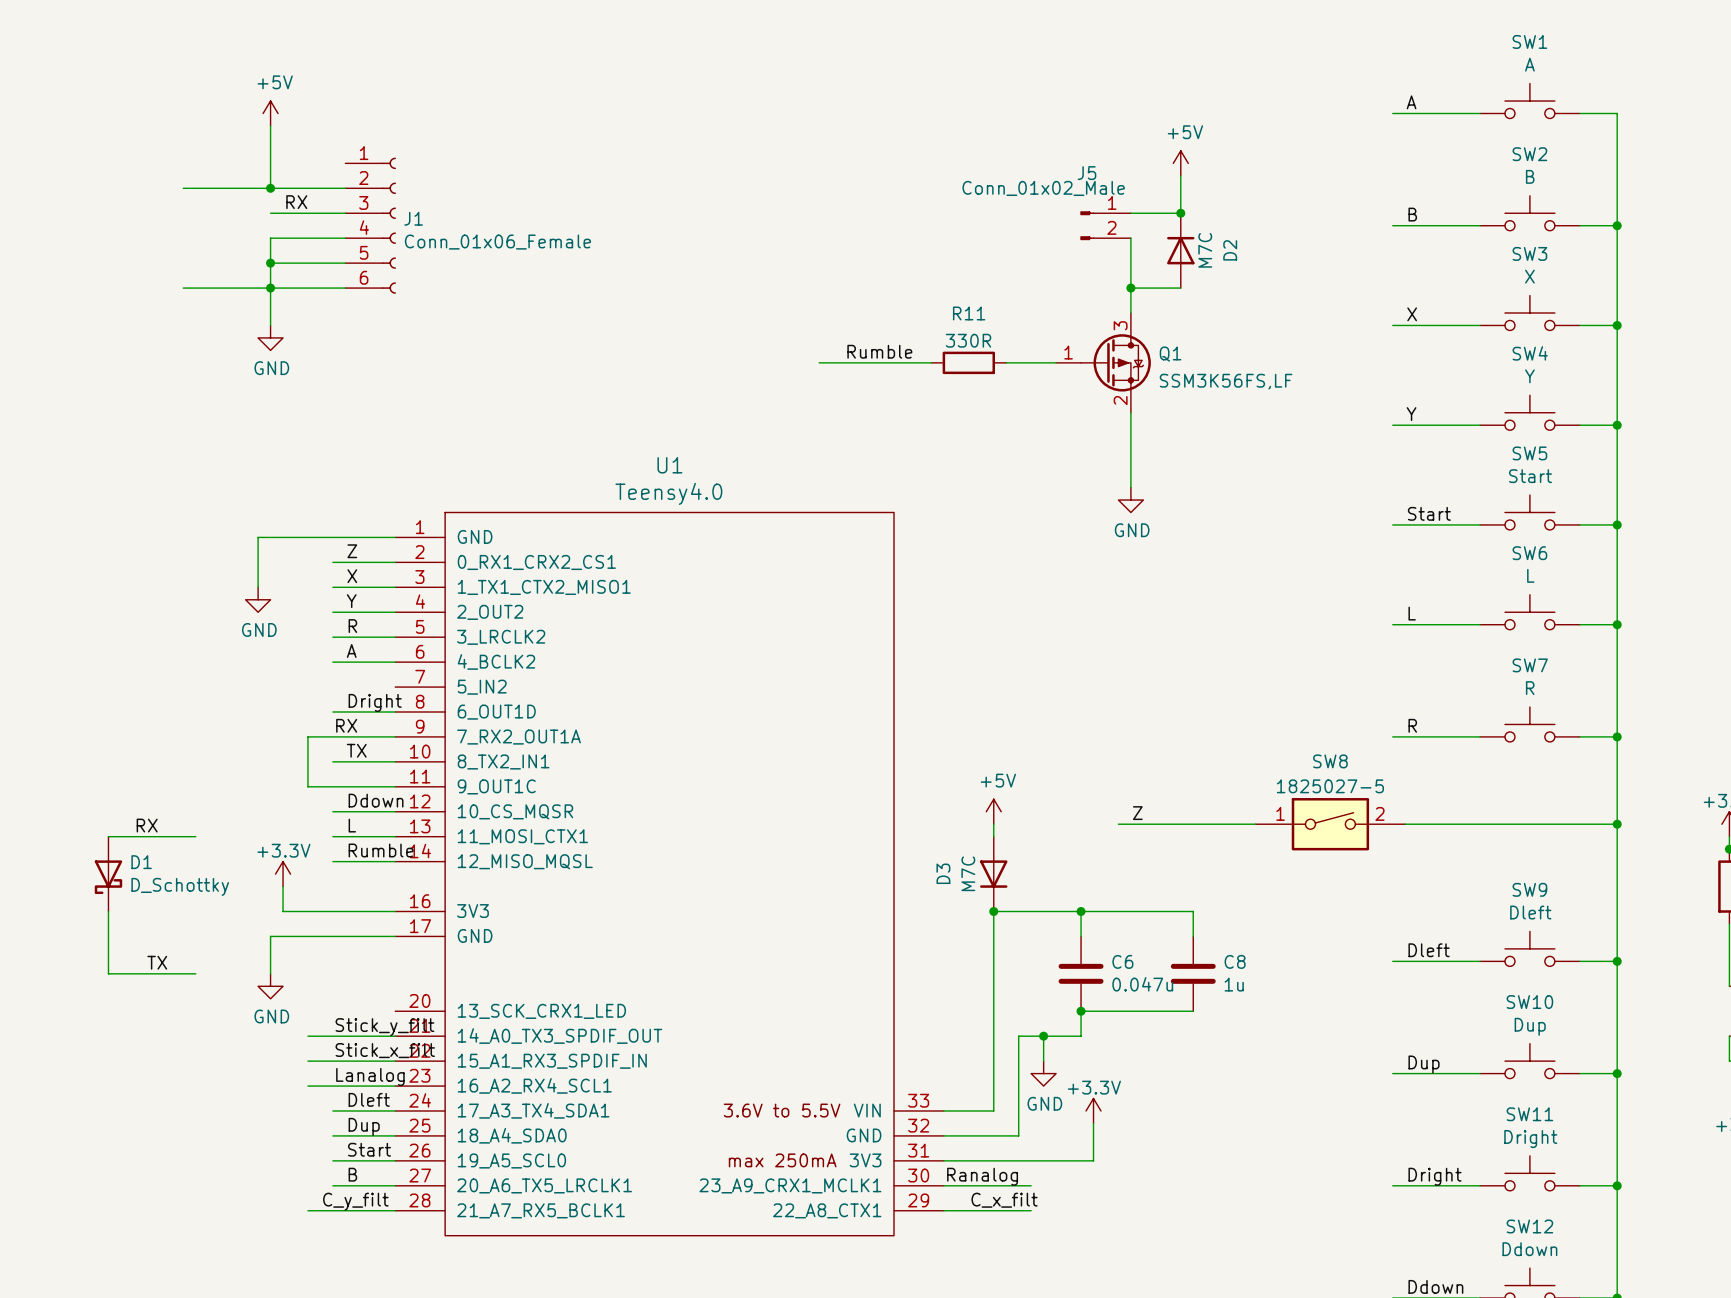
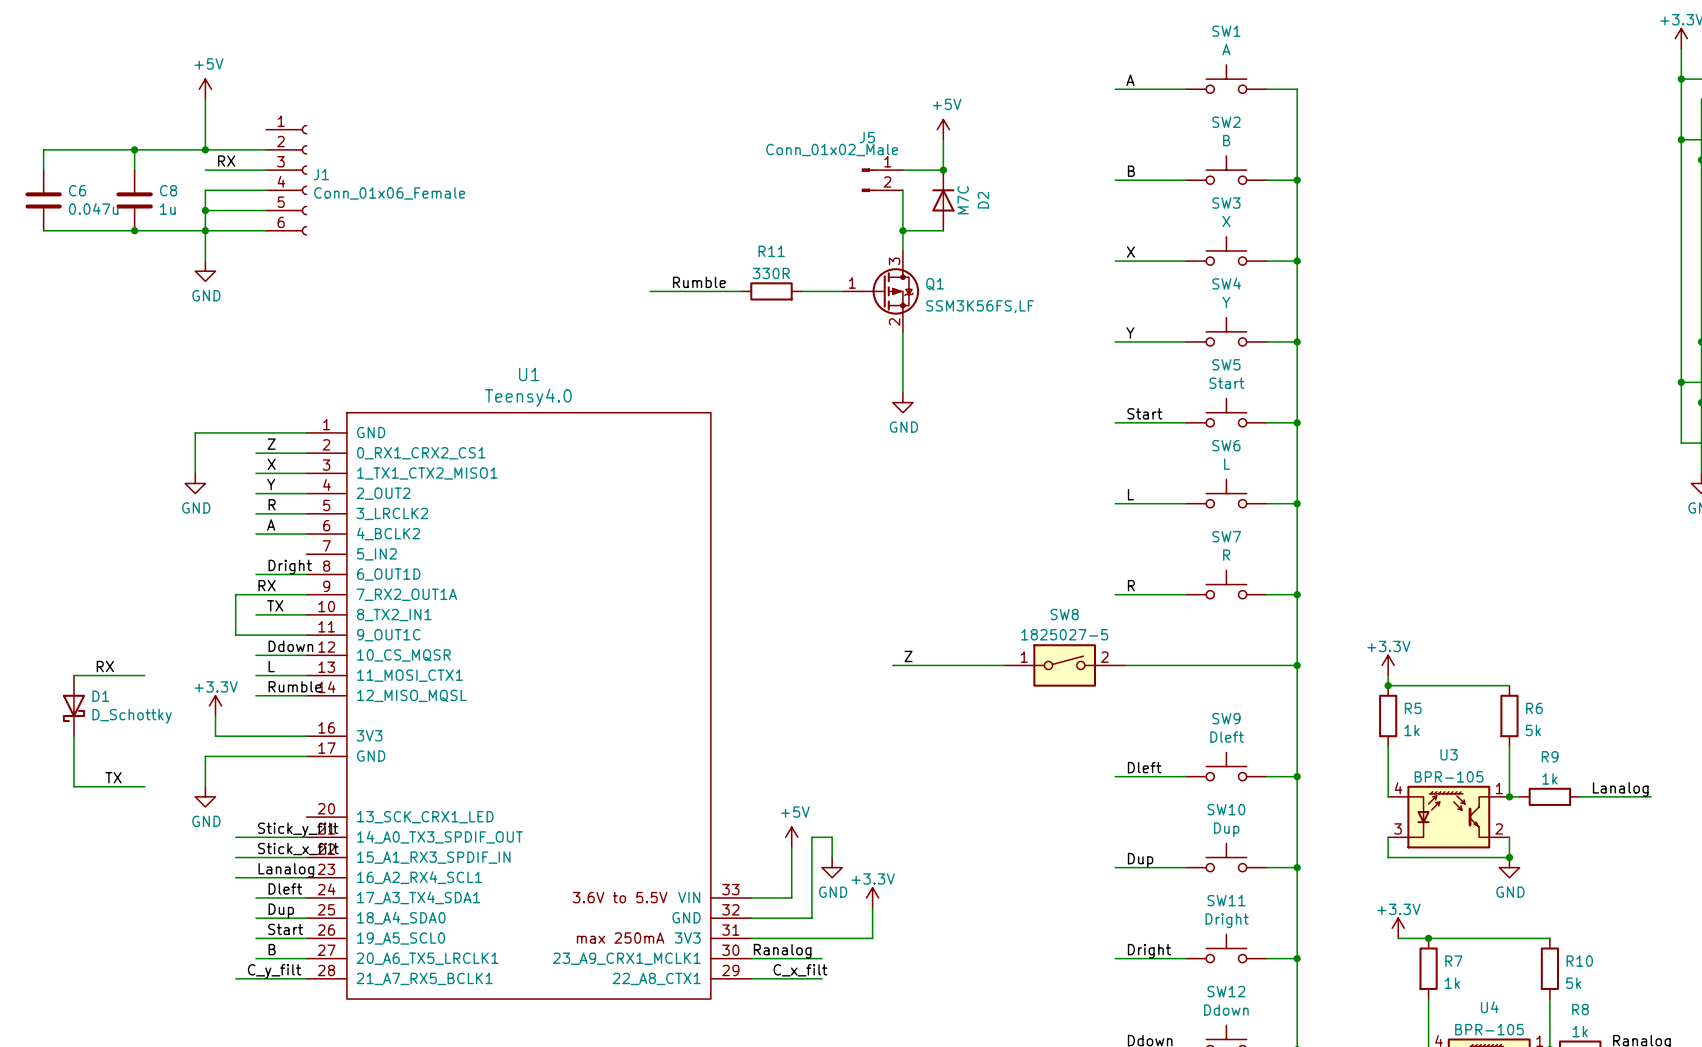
junction: none -> (134, 149)
wire: none -> (43, 170) (43, 149) (134, 149) (134, 170)
wire: none -> (43, 230) (134, 230)
junction: none -> (134, 230)
power symbol position: +5V (993, 811) -> +5V (791, 837)
wire: (993, 824) (993, 836) -> none
D3: M7C (993, 874) -> none
junction: (993, 911) -> none
wire: (1081, 911) (1081, 936) -> none
junction: (1081, 911) -> none
wire: (1193, 936) (1193, 911) (993, 911) (993, 1048) -> none
C6 position: (1081, 973) -> (43, 200)
C8 position: (1193, 973) -> (134, 200)
junction: (1081, 1011) -> none
wire: (1193, 1011) (1081, 1011) (1081, 1036) (1043, 1036) -> none
junction: (1043, 1036) -> none

